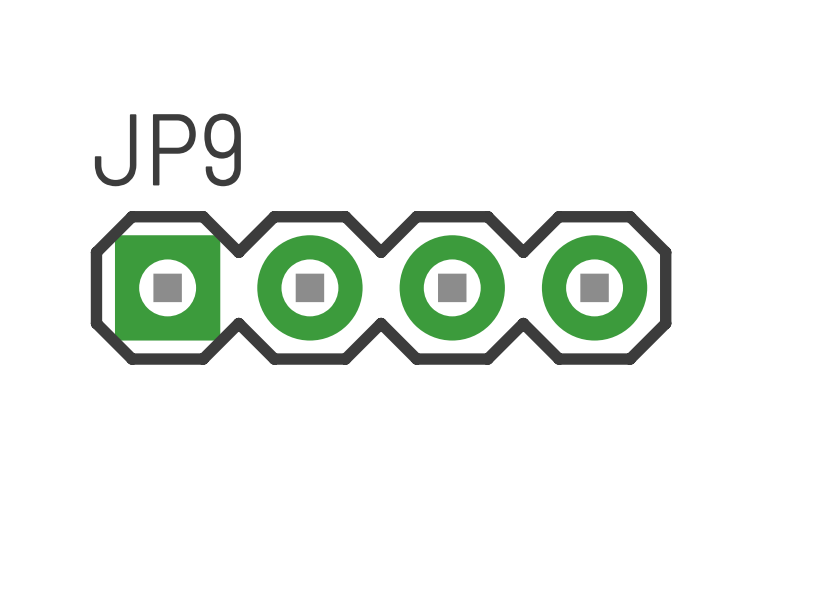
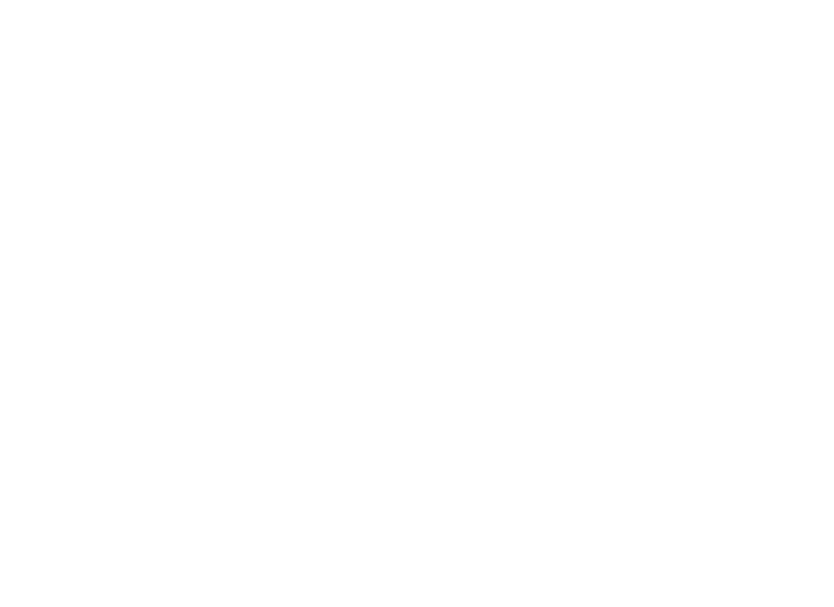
JP9: (381, 287) -> none

